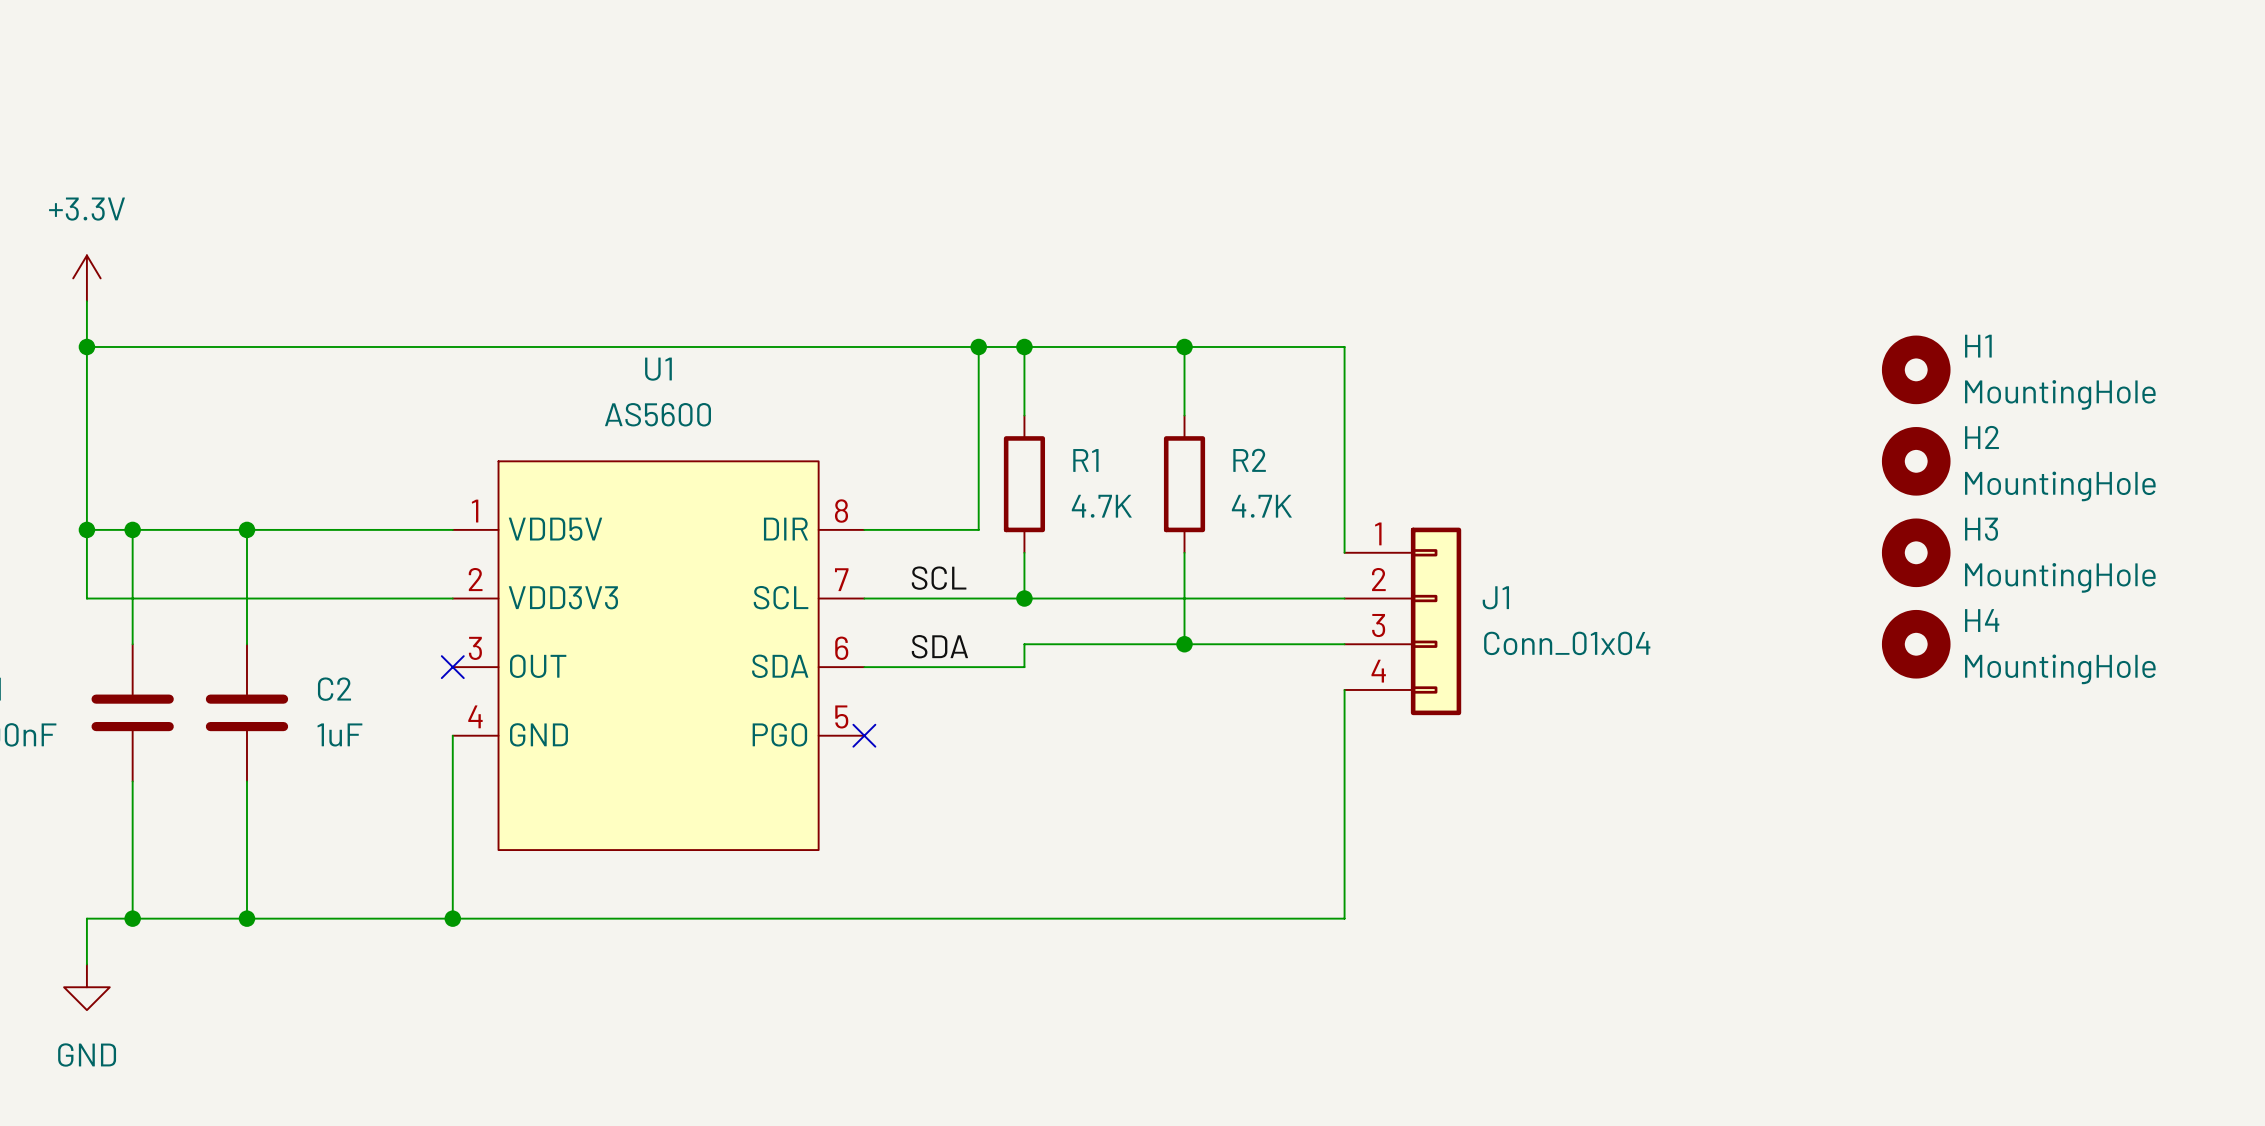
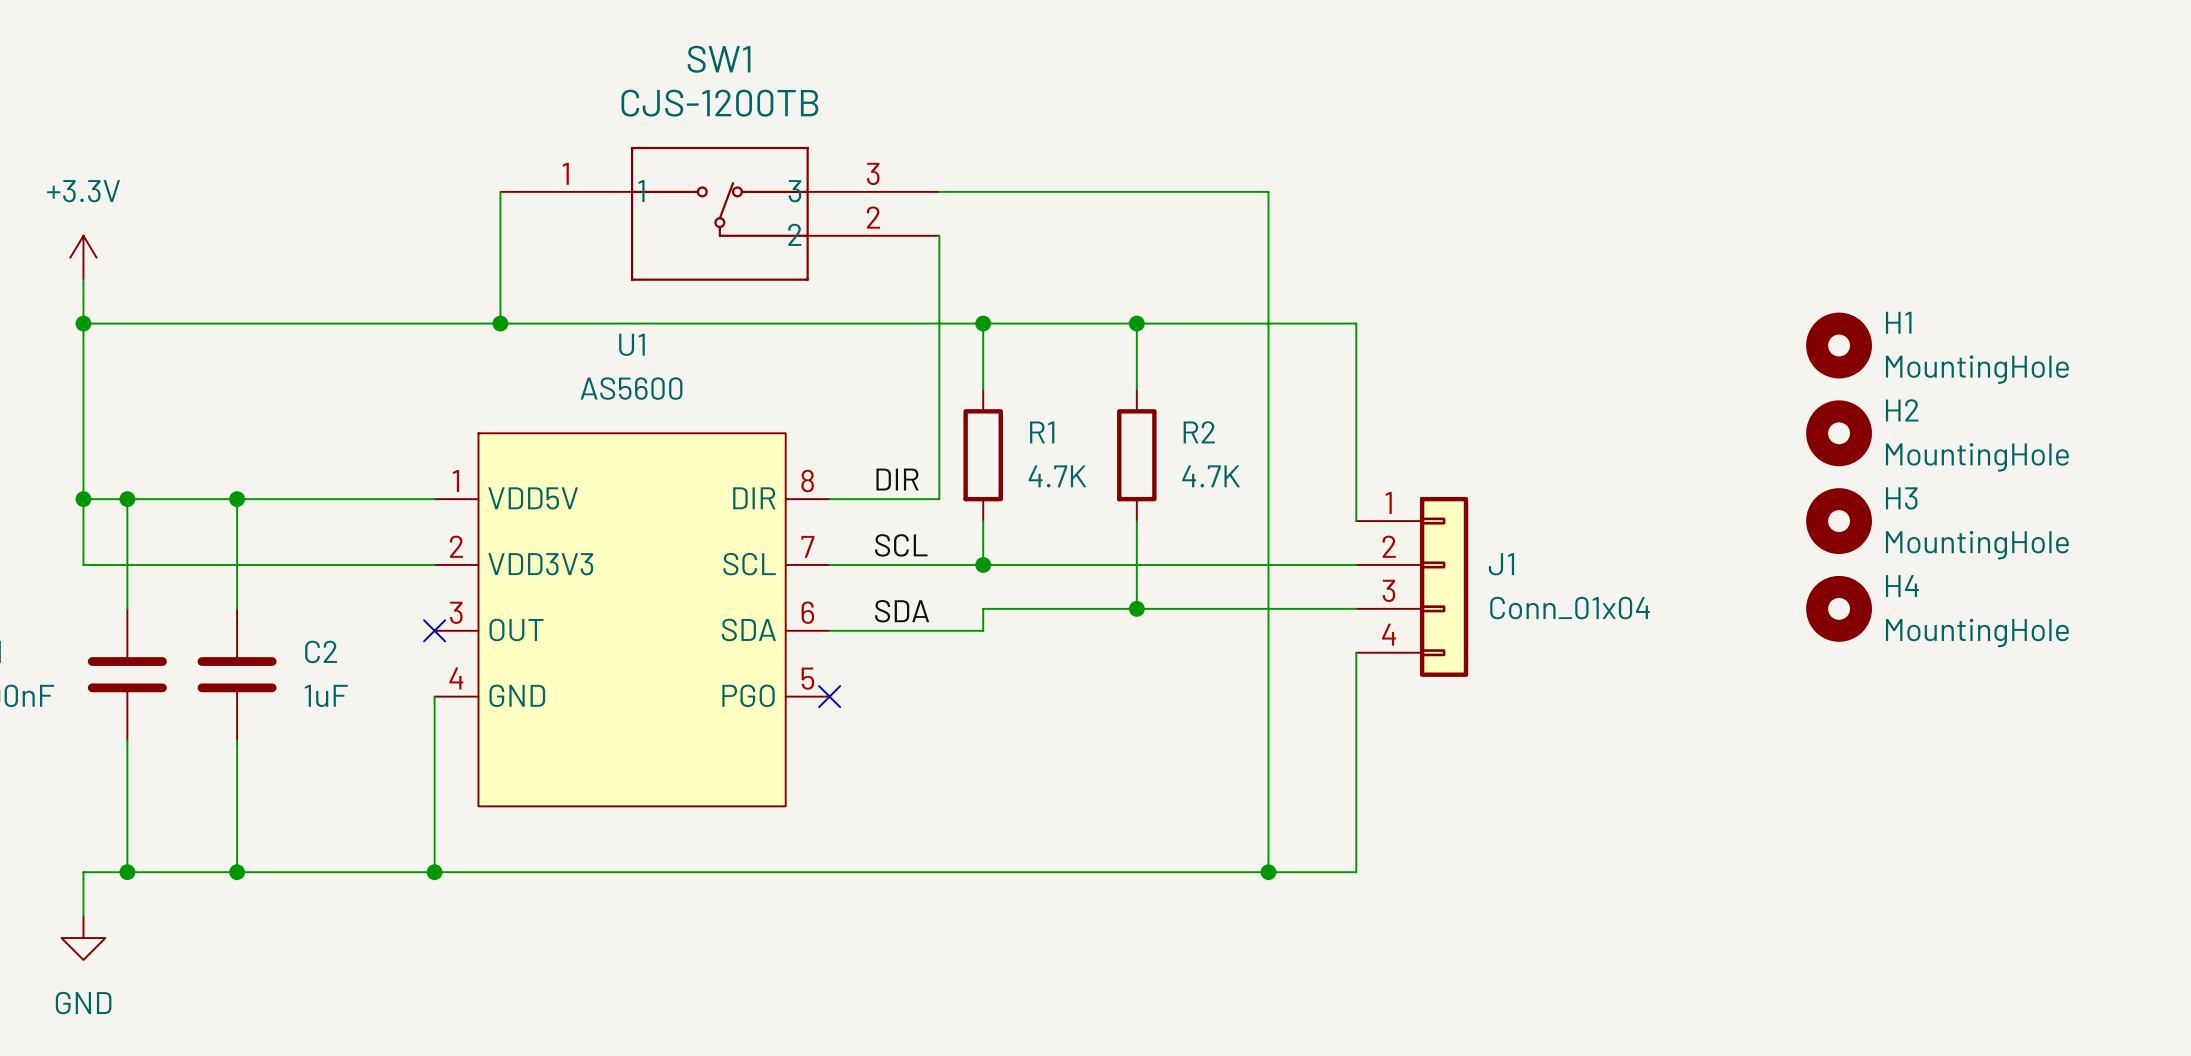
wire: none -> (500, 191) (500, 323)
wire: none -> (939, 191) (1268, 191) (1268, 872)
SW1: none -> CJS-1200TB (719, 213)
wire: none -> (939, 235) (939, 323)
junction: none -> (500, 323)
junction: (978, 346) -> none
wire: (1344, 346) (1344, 552) -> (1290, 323) (1356, 323) (1356, 521)
label: none -> DIR (897, 479)
J1 position: (1402, 621) -> (1412, 586)
wire: (1344, 689) (1344, 918) -> (1356, 652) (1356, 872) (1290, 872)
junction: none -> (1268, 872)

